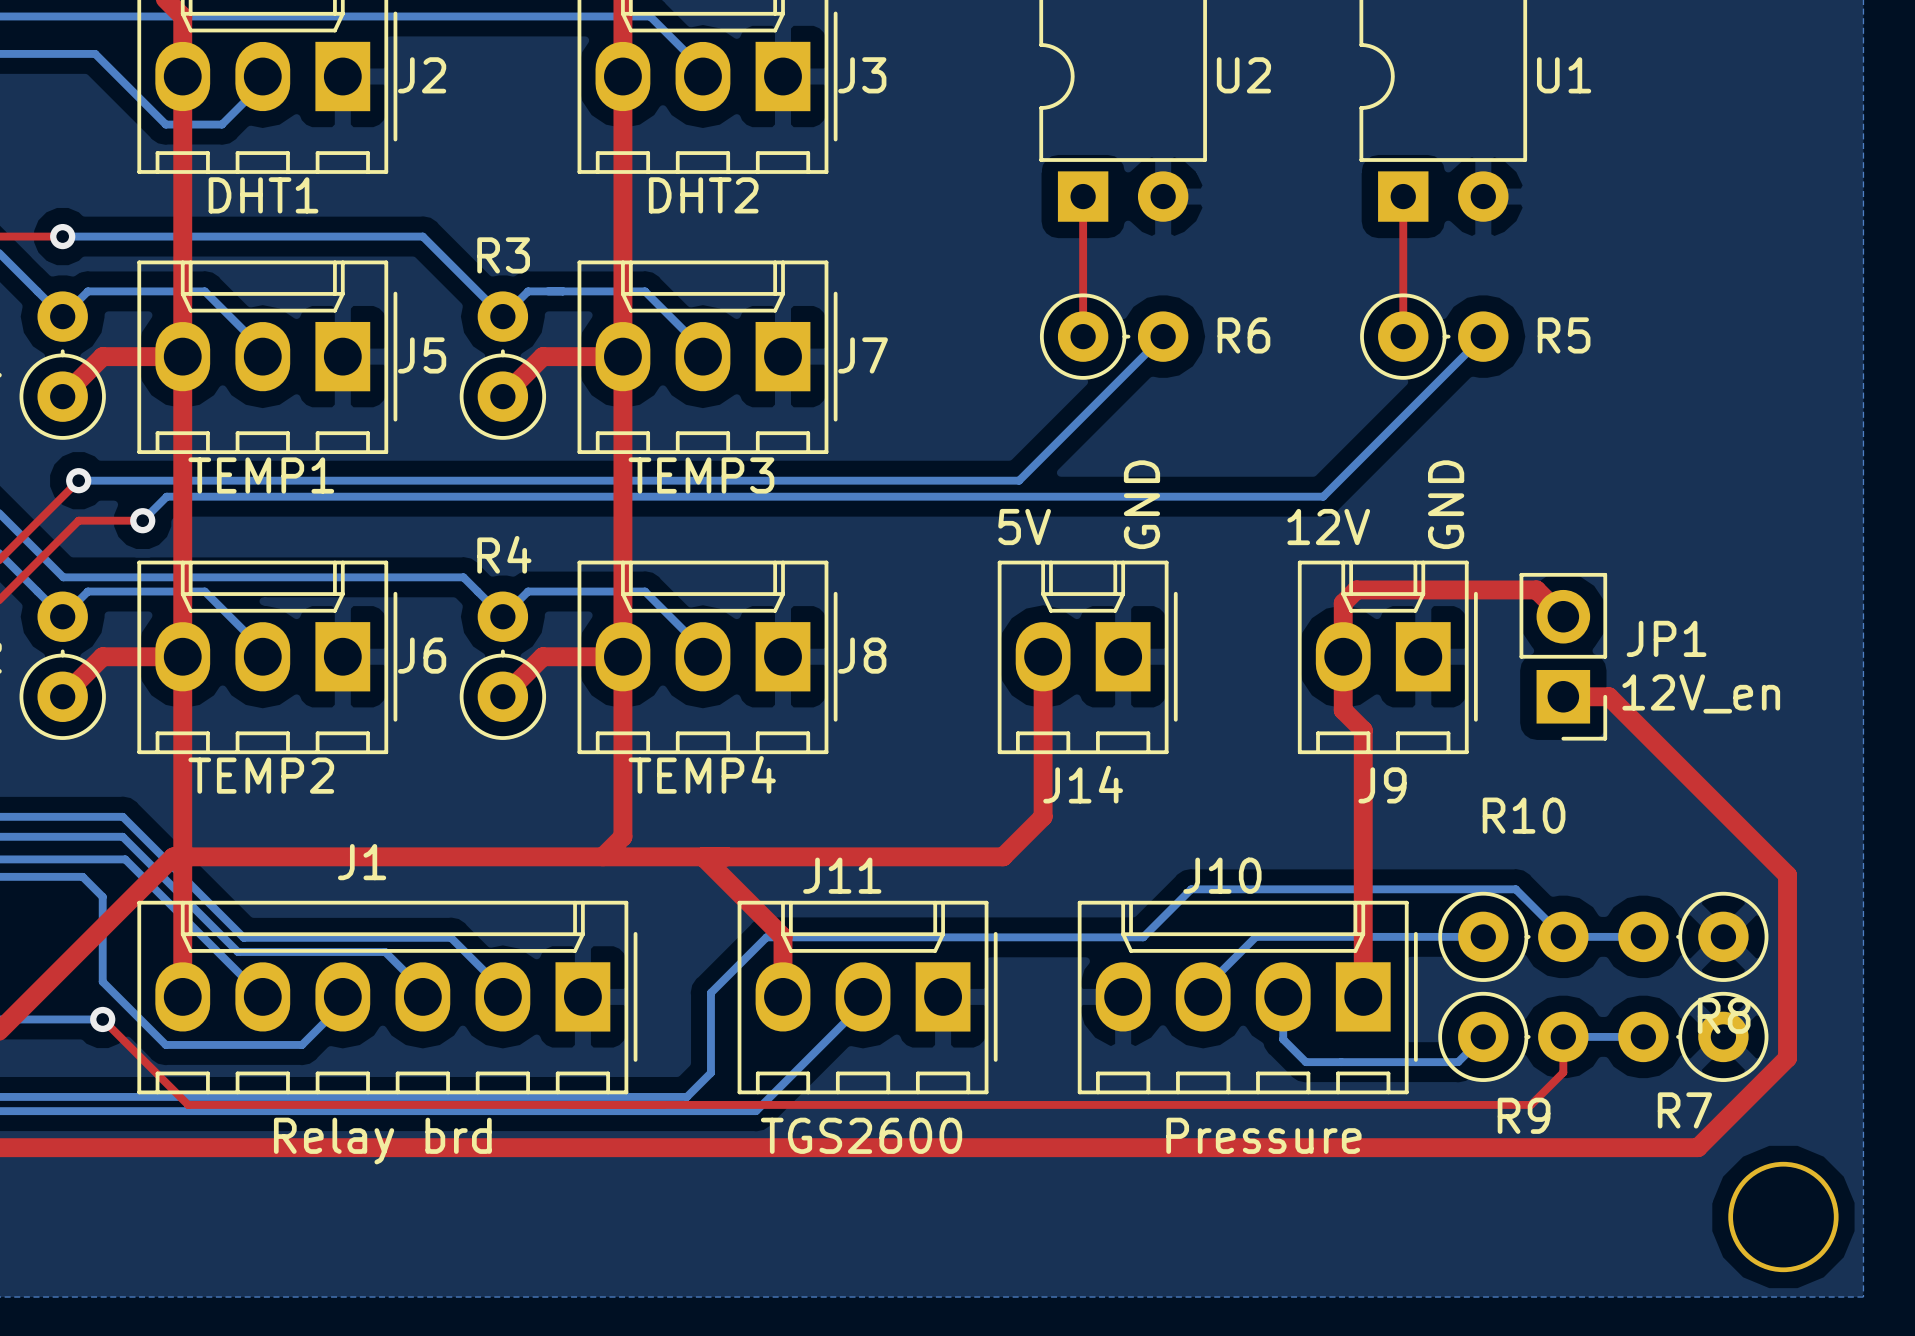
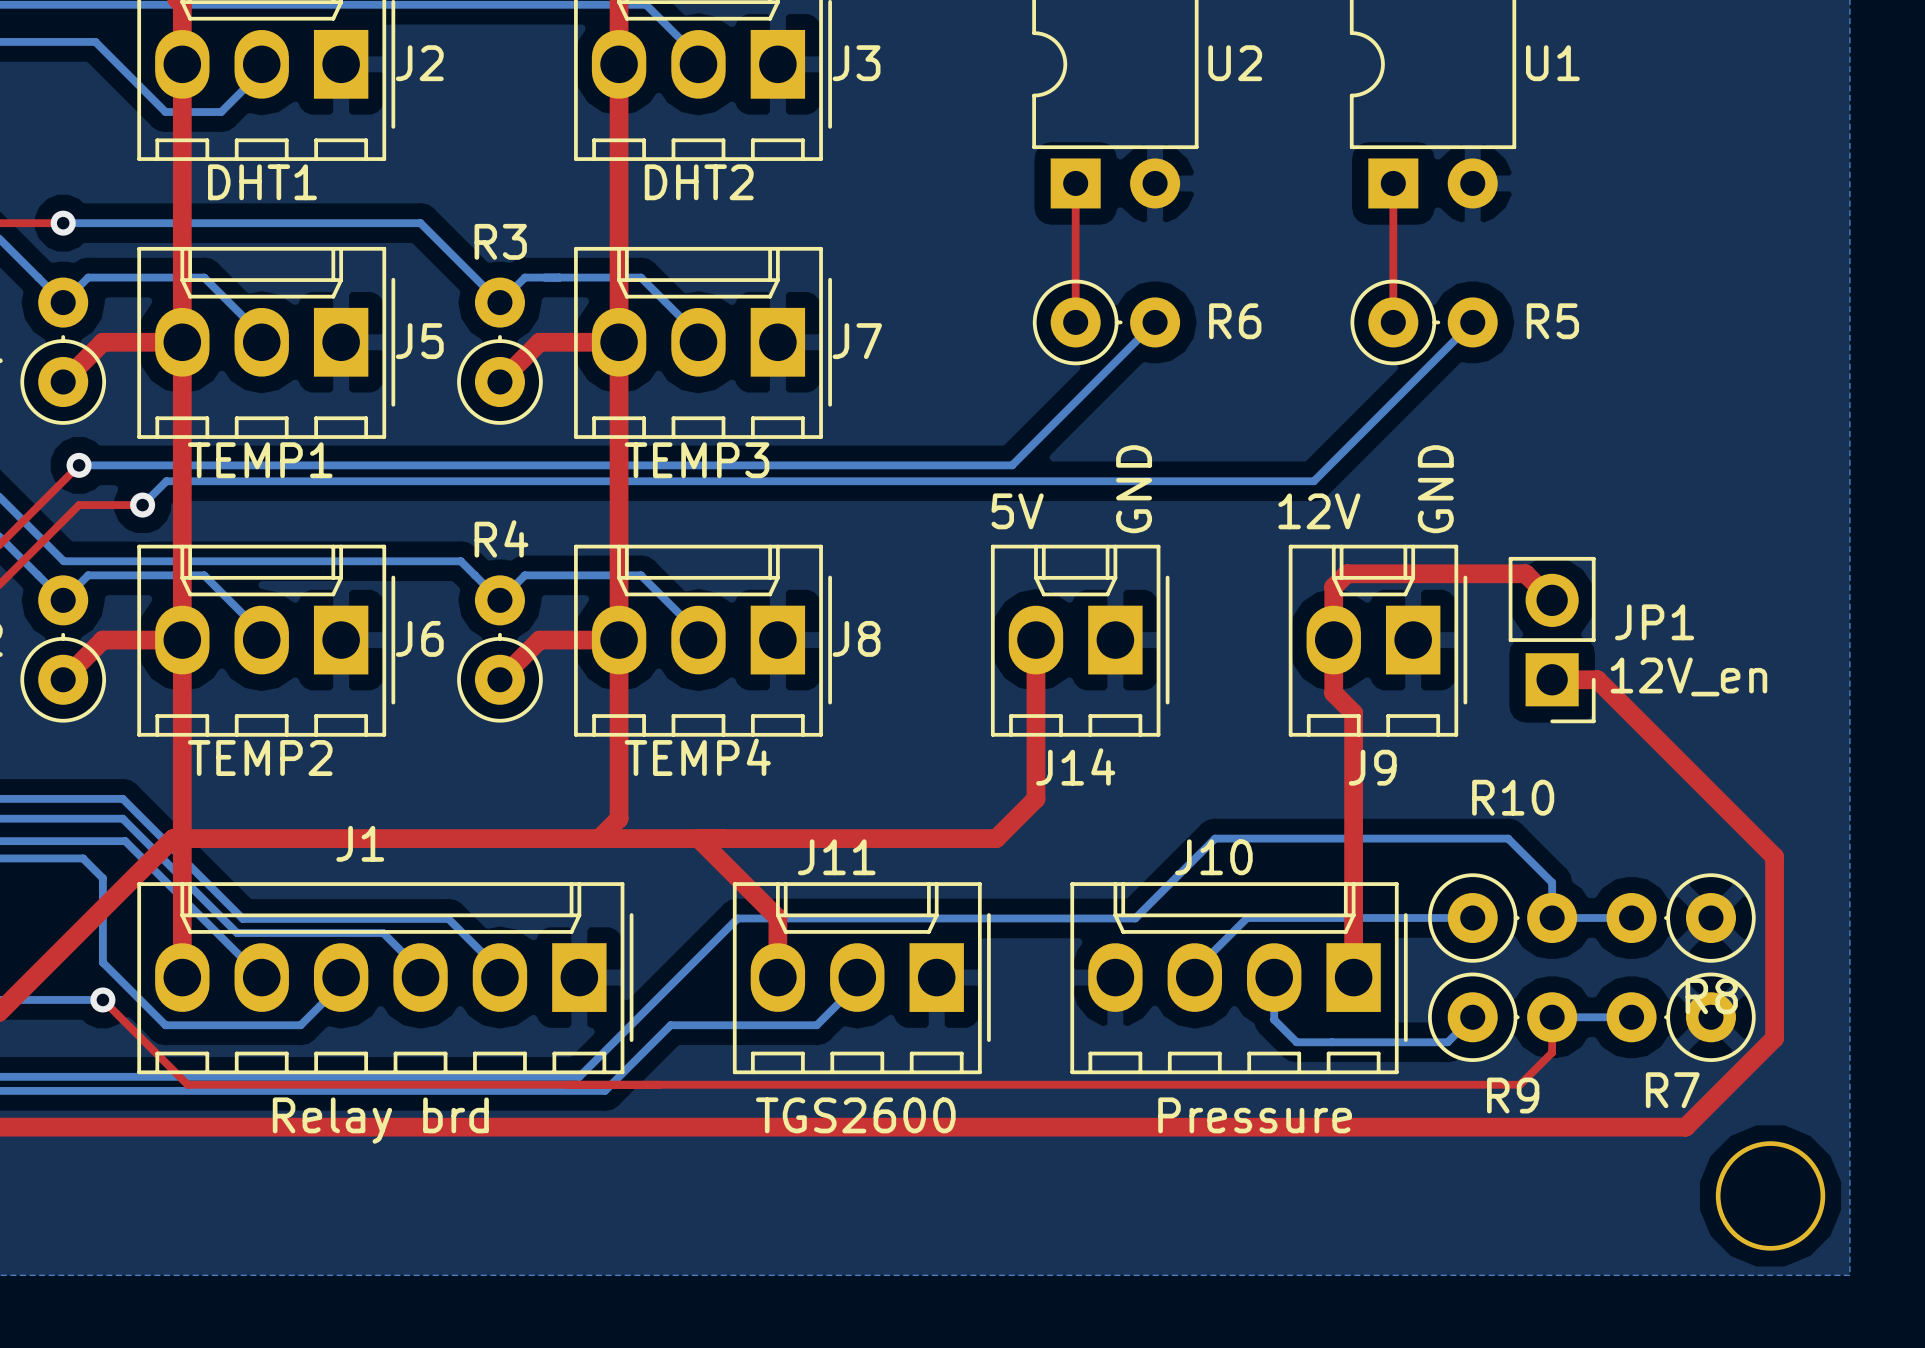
bottom track: (1191, 889) (1515, 889) (1563, 936) -> (1182, 870) (1215, 838) (1508, 838) (1552, 882) (1552, 918)
bottom track: (766, 937) (710, 992) (710, 1072) (686, 1096) (582, 1096) -> (761, 918) (737, 918) (579, 1076)
bottom track: (822, 1044) (756, 1111) (608, 1111) -> (816, 1025) (670, 1025) (605, 1090)

